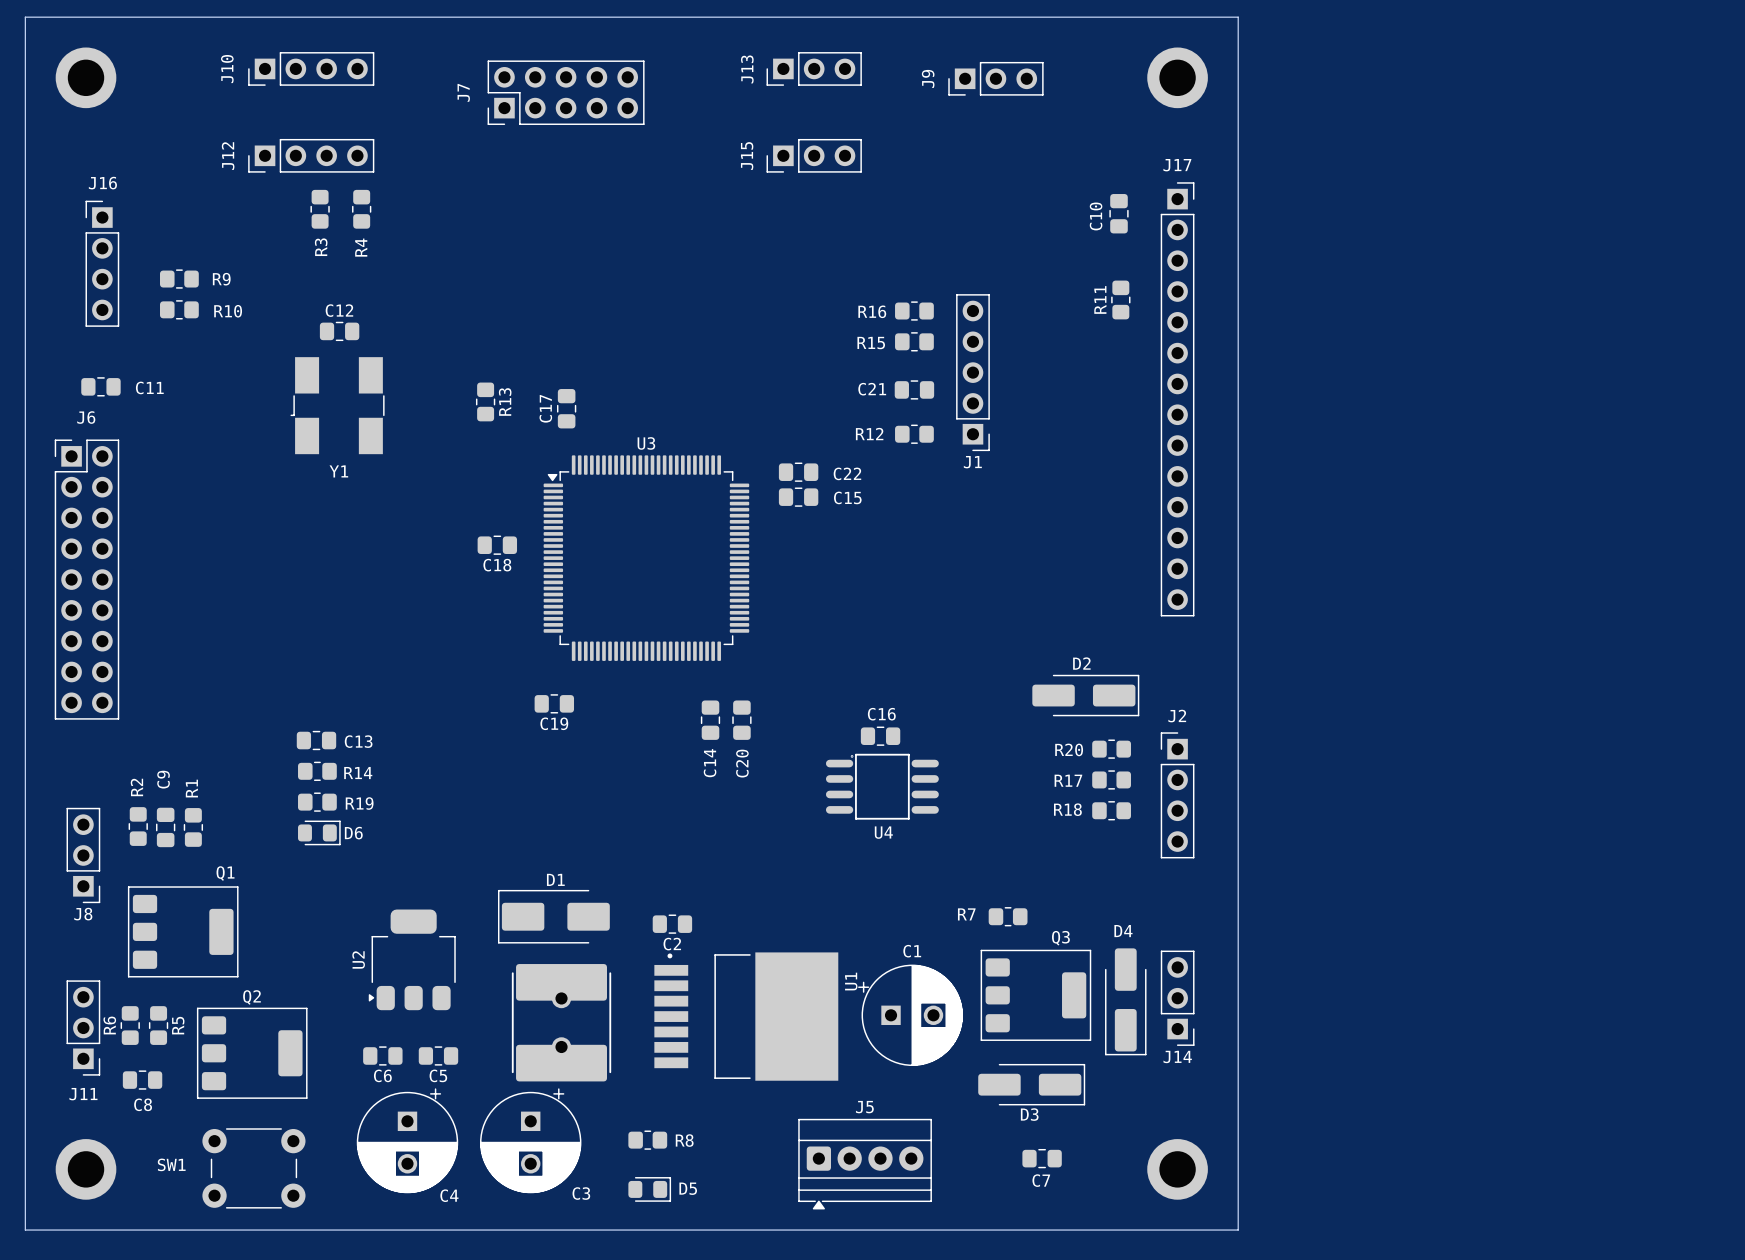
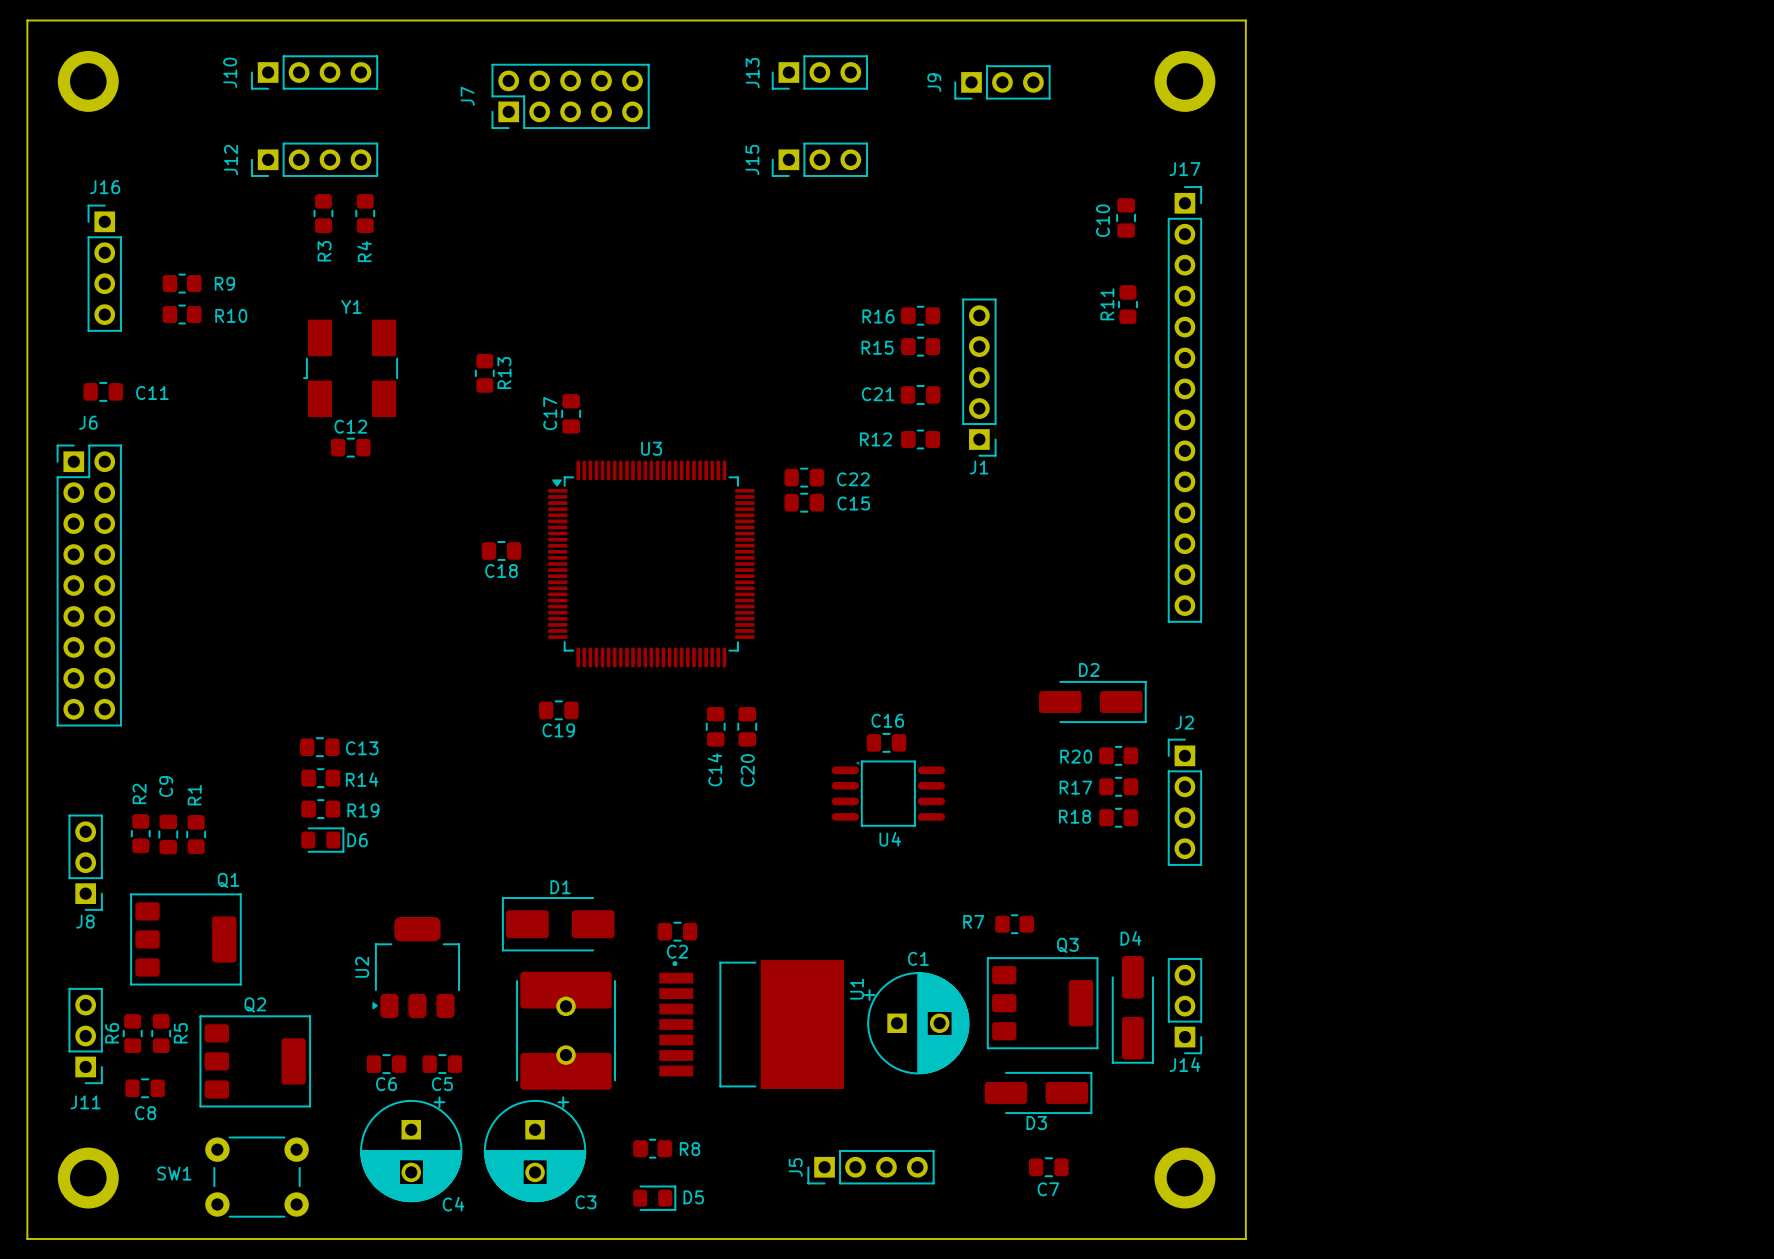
C12 position: (339, 331) -> (350, 447)
R13 position: (485, 401) -> (484, 373)
Y1 position: (337, 405) -> (350, 368)
Y1 name position: Y1 (338, 471) -> Y1 (351, 306)
J5 name position: J5 (864, 1107) -> J5 (795, 1167)
J5 footprint: [798, 1118, 932, 1210] -> [807, 1150, 935, 1185]

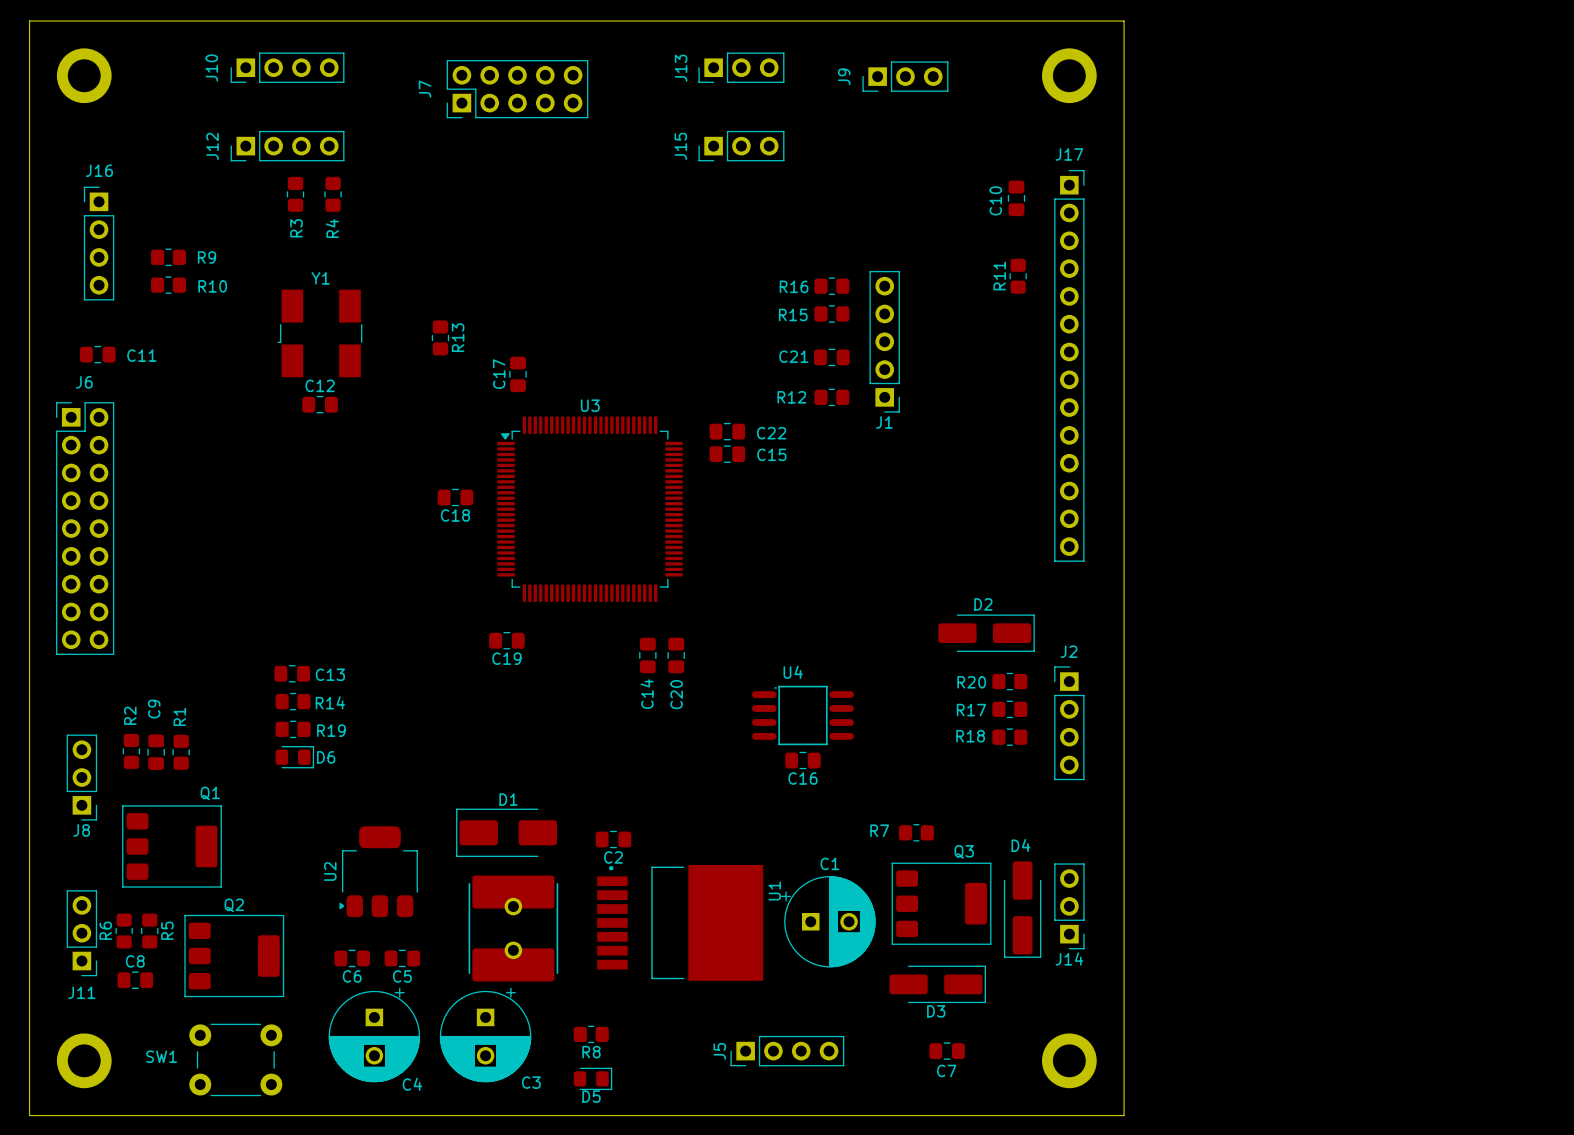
C16 name position: C16 (887, 720) -> C16 (802, 778)
C16 position: (886, 742) -> (802, 760)
U4 name position: U4 (890, 839) -> U4 (793, 672)
C8 name position: C8 (145, 1113) -> C8 (135, 961)
R8 name position: R8 (689, 1149) -> R8 (591, 1052)
D5 name position: D5 (693, 1197) -> D5 (591, 1096)

